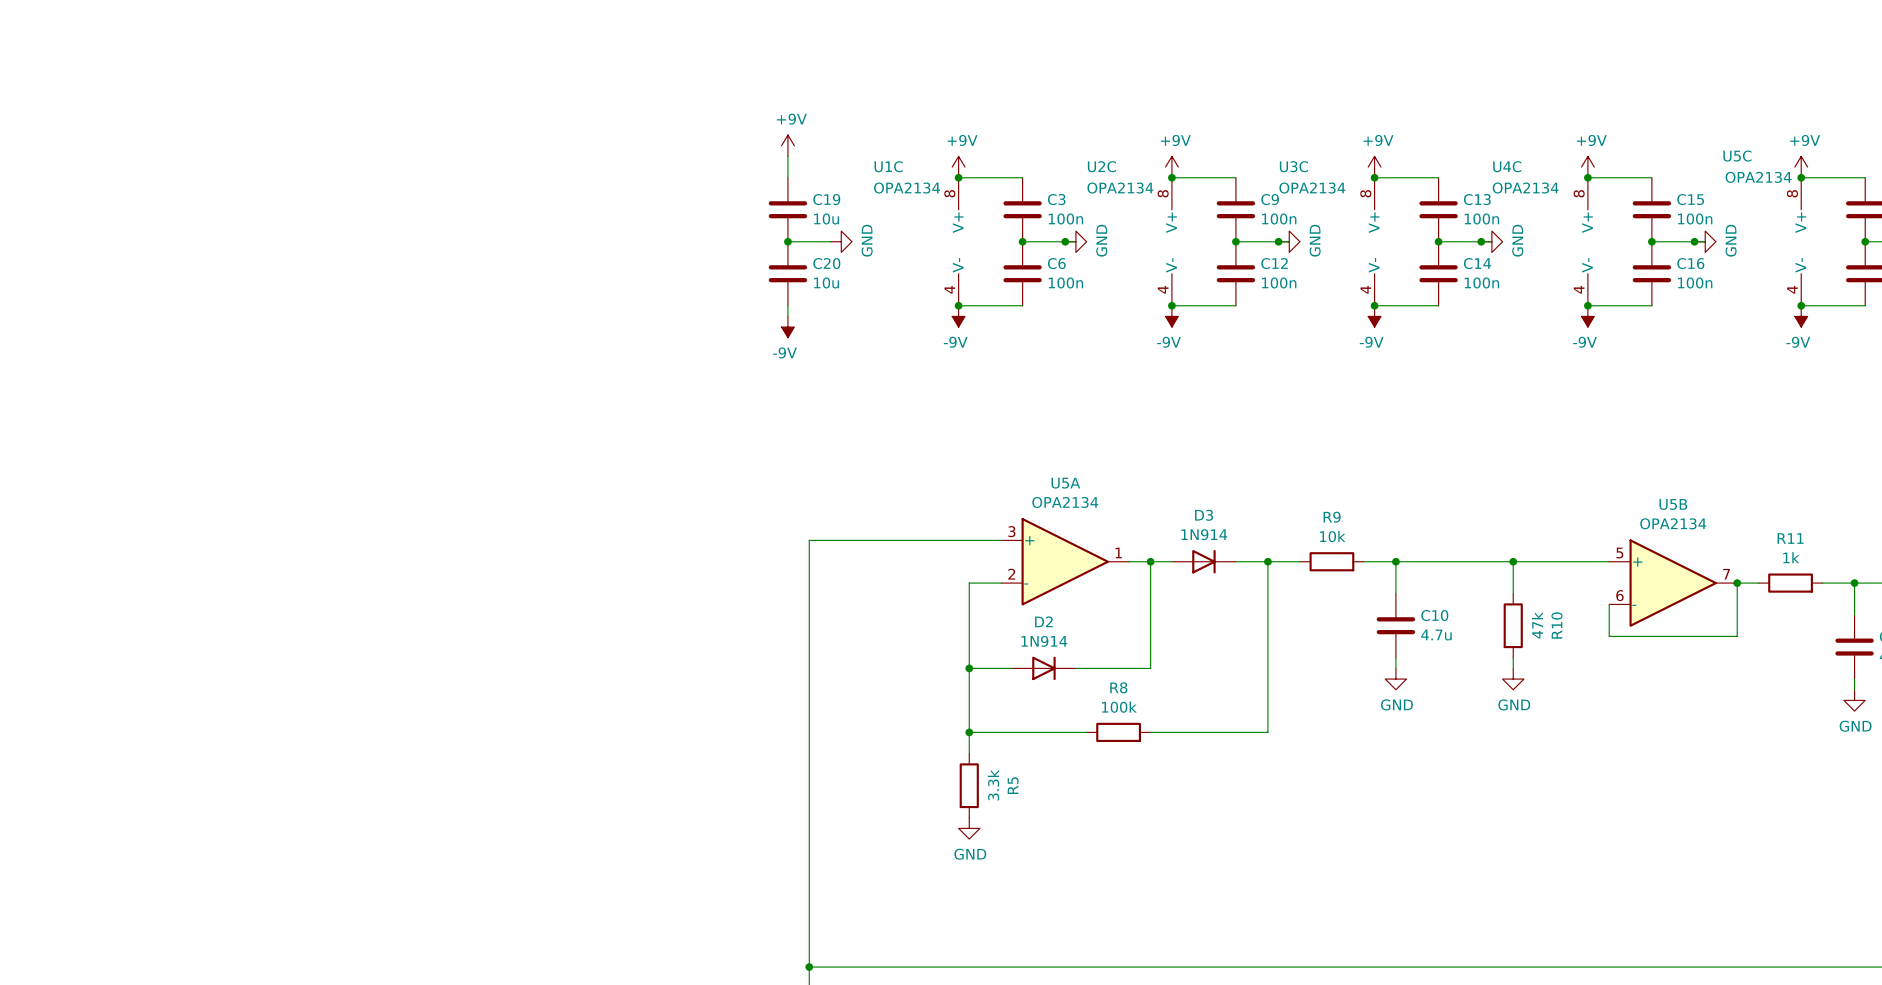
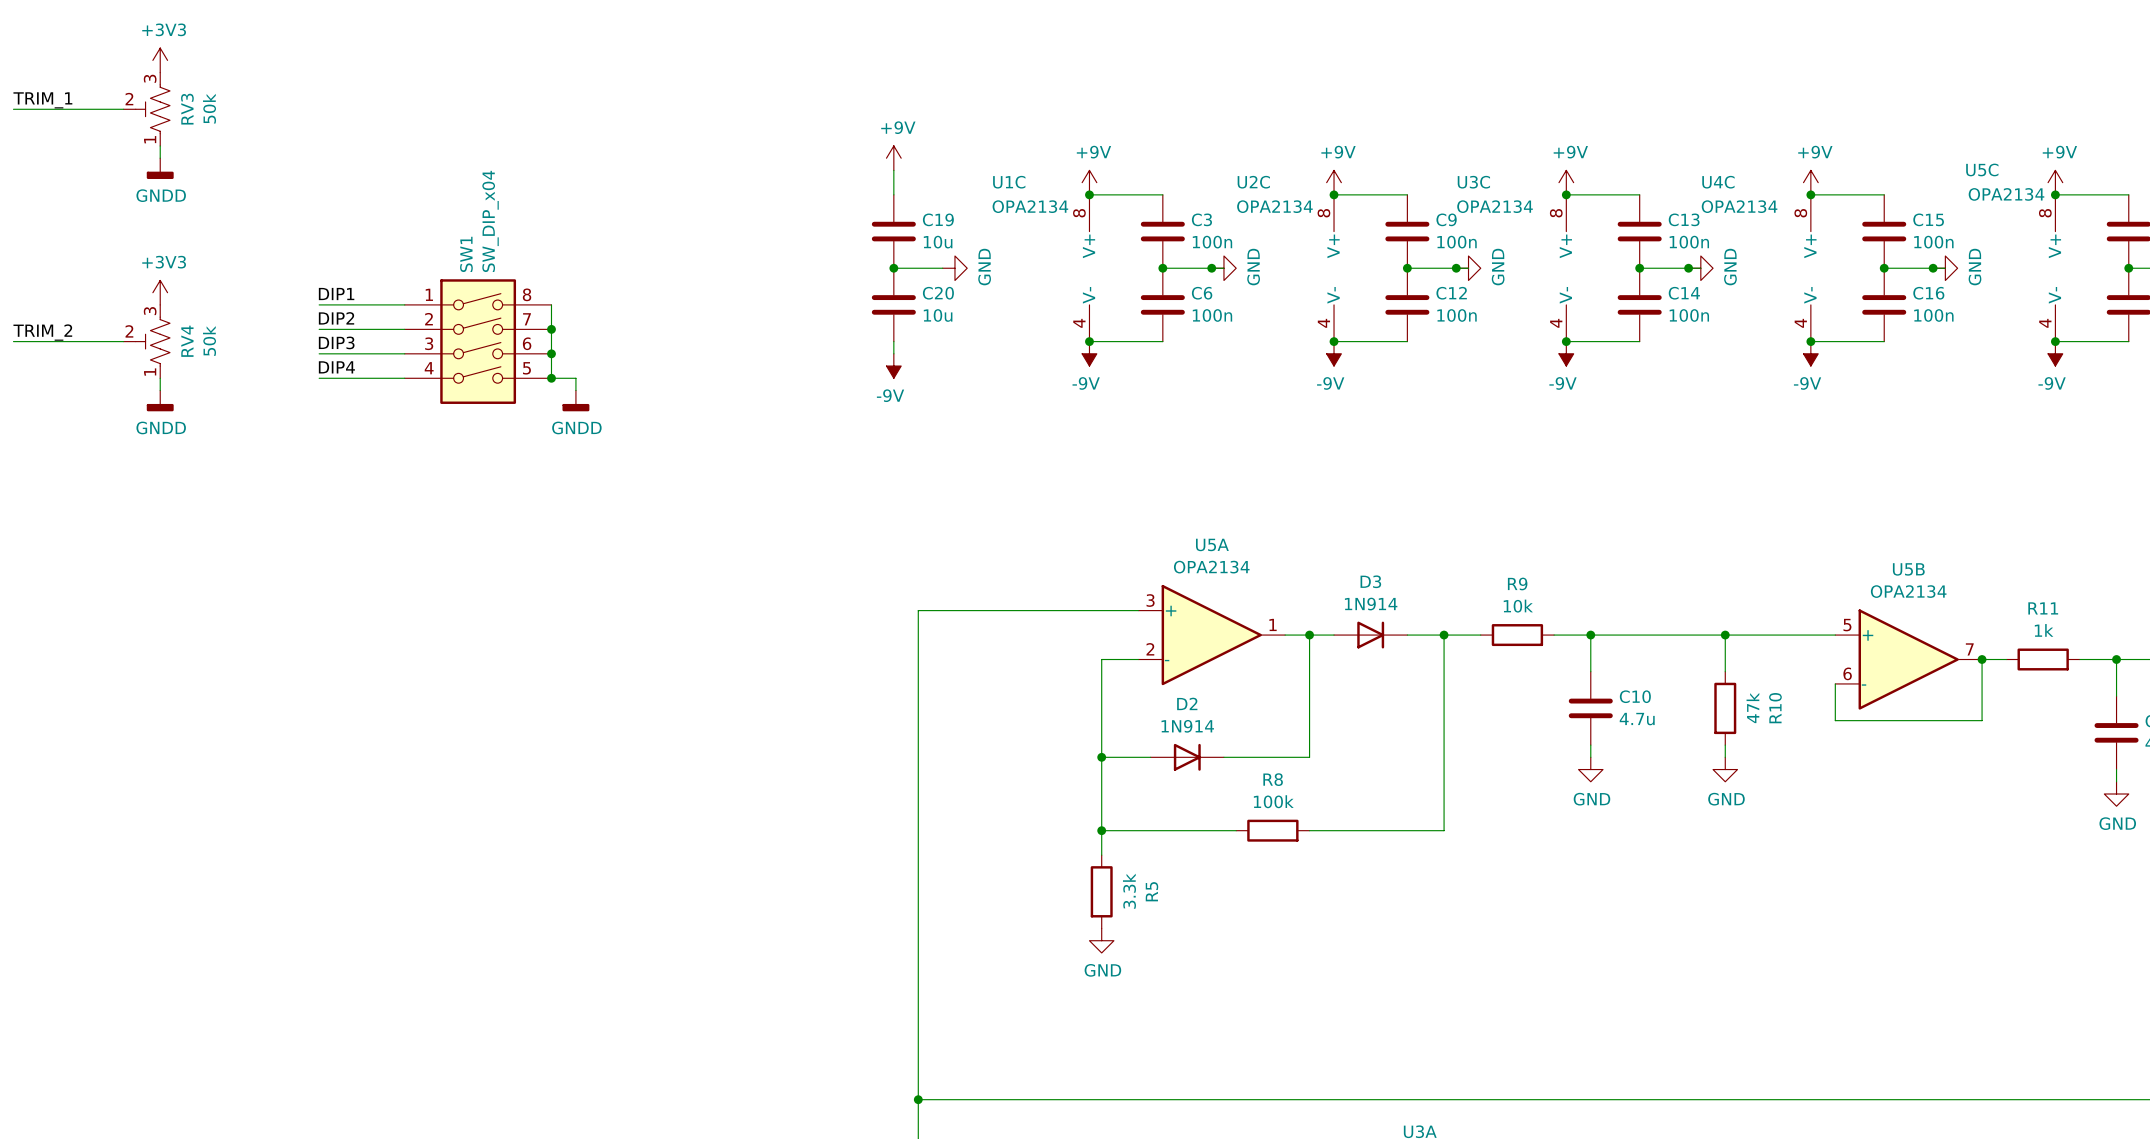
power symbol: none -> +3V3 (160, 60)
label: none -> TRIM_1 (42, 100)
wire: none -> (13, 109) (123, 109)
RV3: none -> 50k (146, 109)
wire: none -> (160, 145) (160, 158)
power symbol: none -> GNDD (160, 168)
power symbol: none -> +3V3 (160, 292)
label: none -> DIP1 (336, 294)
wire: none -> (319, 304) (404, 304)
wire: none -> (551, 304) (551, 378) (575, 378) (575, 390)
label: none -> DIP2 (336, 318)
wire: none -> (319, 329) (404, 329)
junction: none -> (551, 329)
label: none -> TRIM_2 (42, 332)
wire: none -> (13, 341) (123, 341)
RV4: none -> 50k (146, 341)
SW1: none -> SW_DIP_x04 (478, 341)
label: none -> DIP3 (336, 342)
wire: none -> (319, 353) (404, 353)
junction: none -> (551, 353)
label: none -> DIP4 (336, 367)
wire: none -> (160, 378) (160, 390)
wire: none -> (319, 378) (404, 378)
junction: none -> (551, 378)
power symbol: none -> GNDD (160, 400)
power symbol: none -> GNDD (575, 400)

